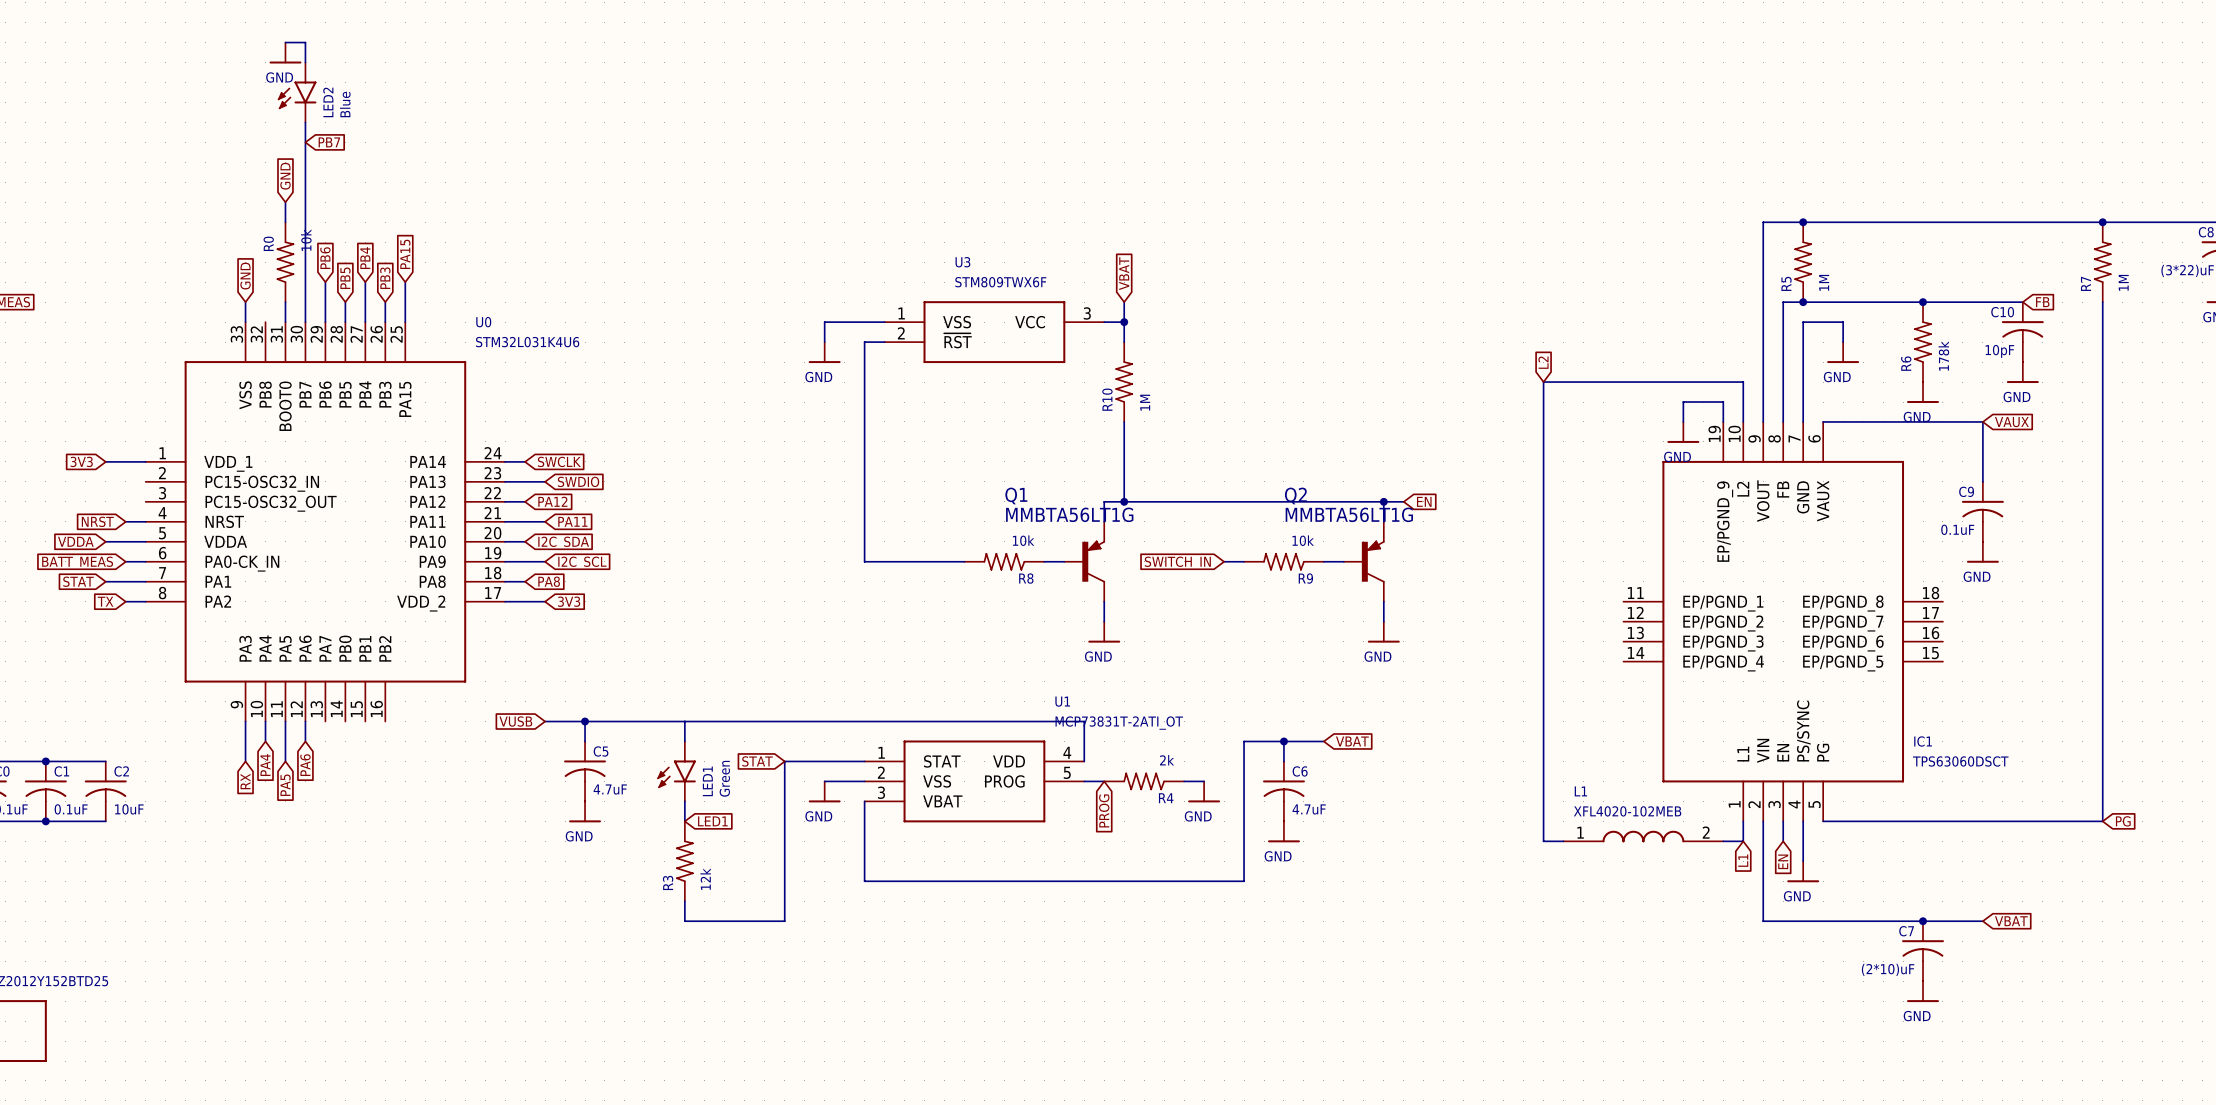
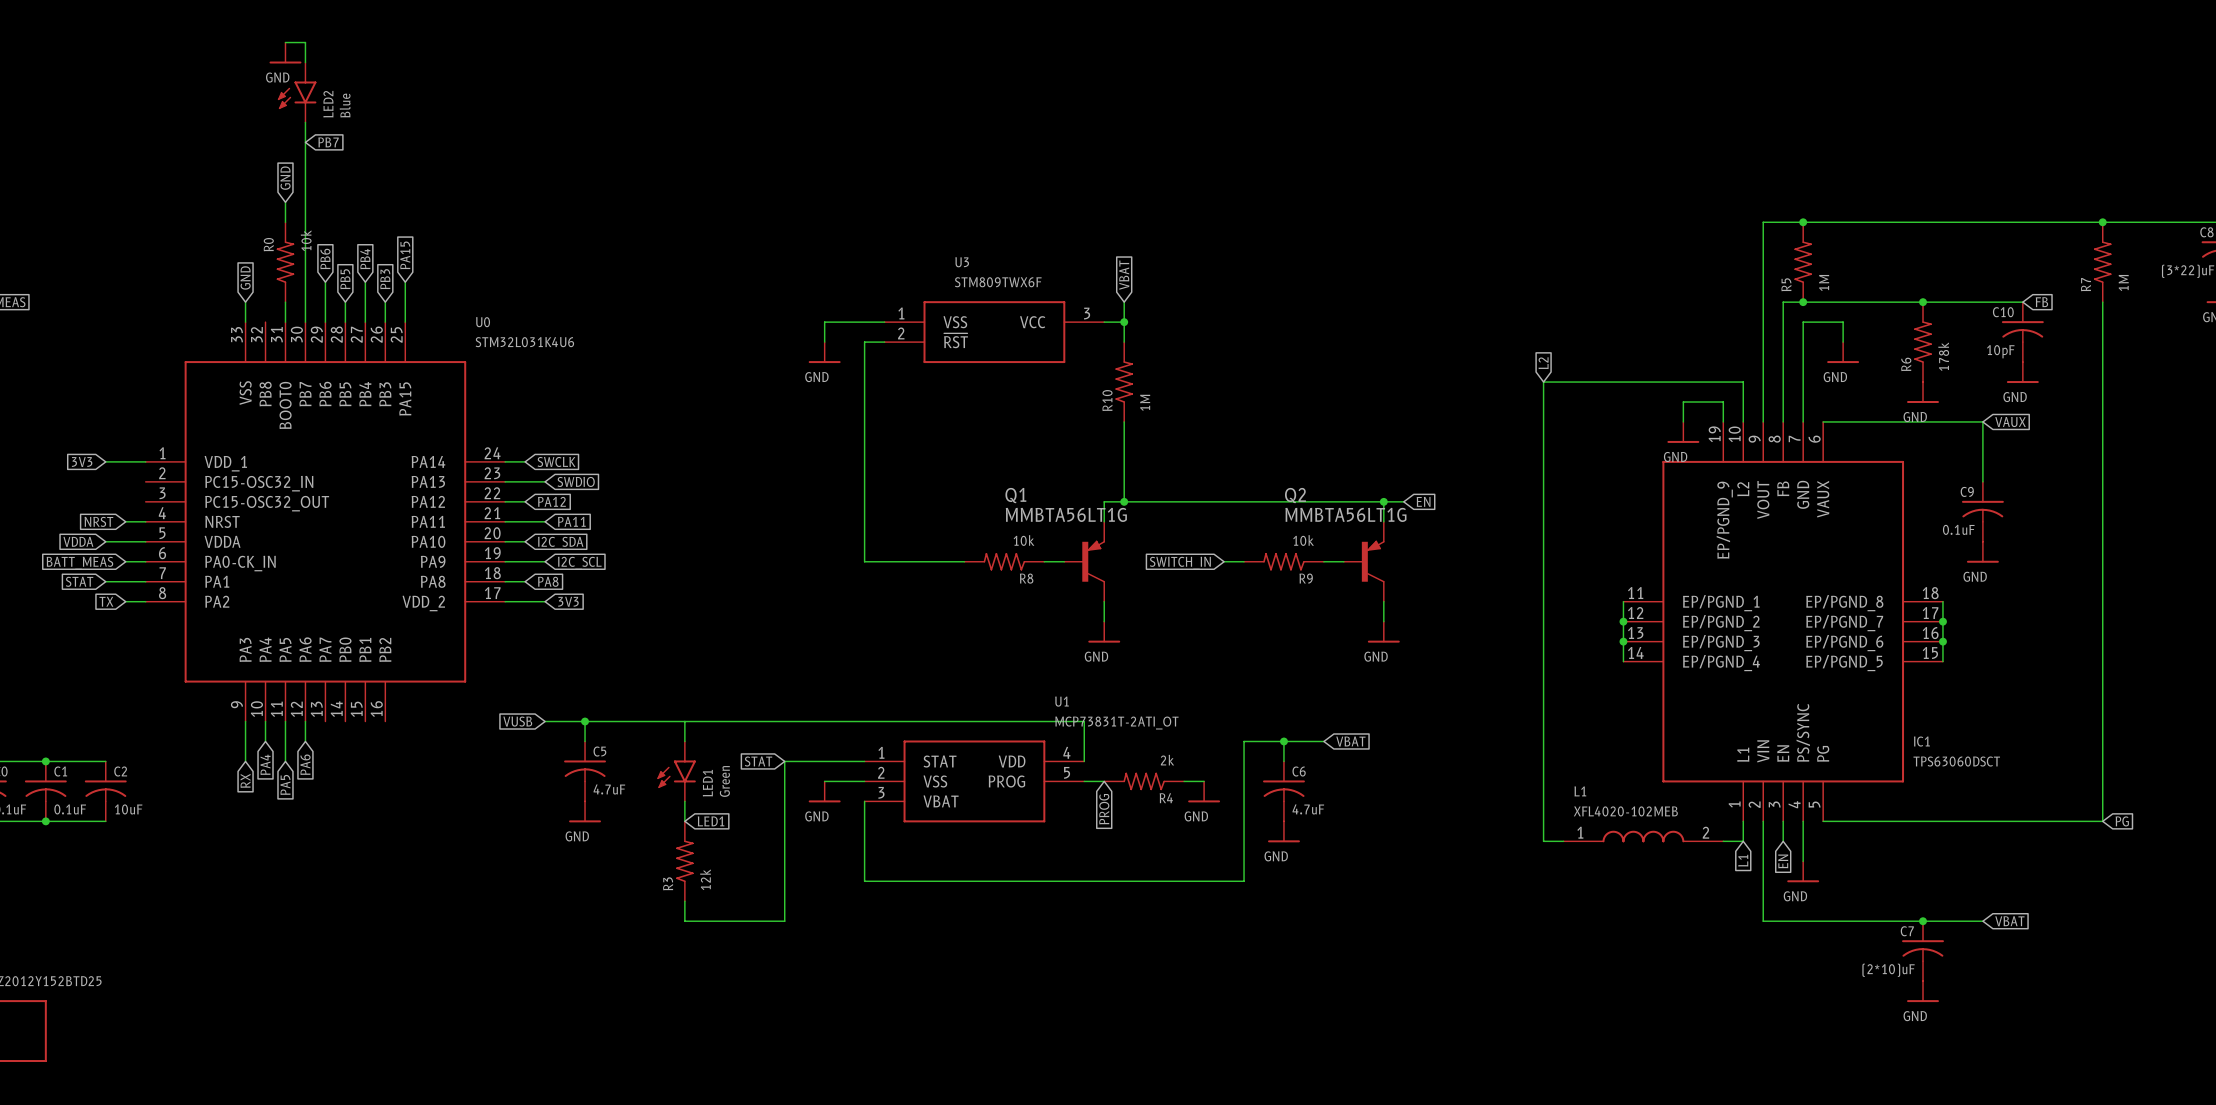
wire: none -> (1623, 601) (1623, 661)
wire: none -> (1942, 601) (1942, 661)
junction: none -> (1623, 621)
junction: none -> (1942, 621)
junction: none -> (1623, 641)
junction: none -> (1942, 641)

